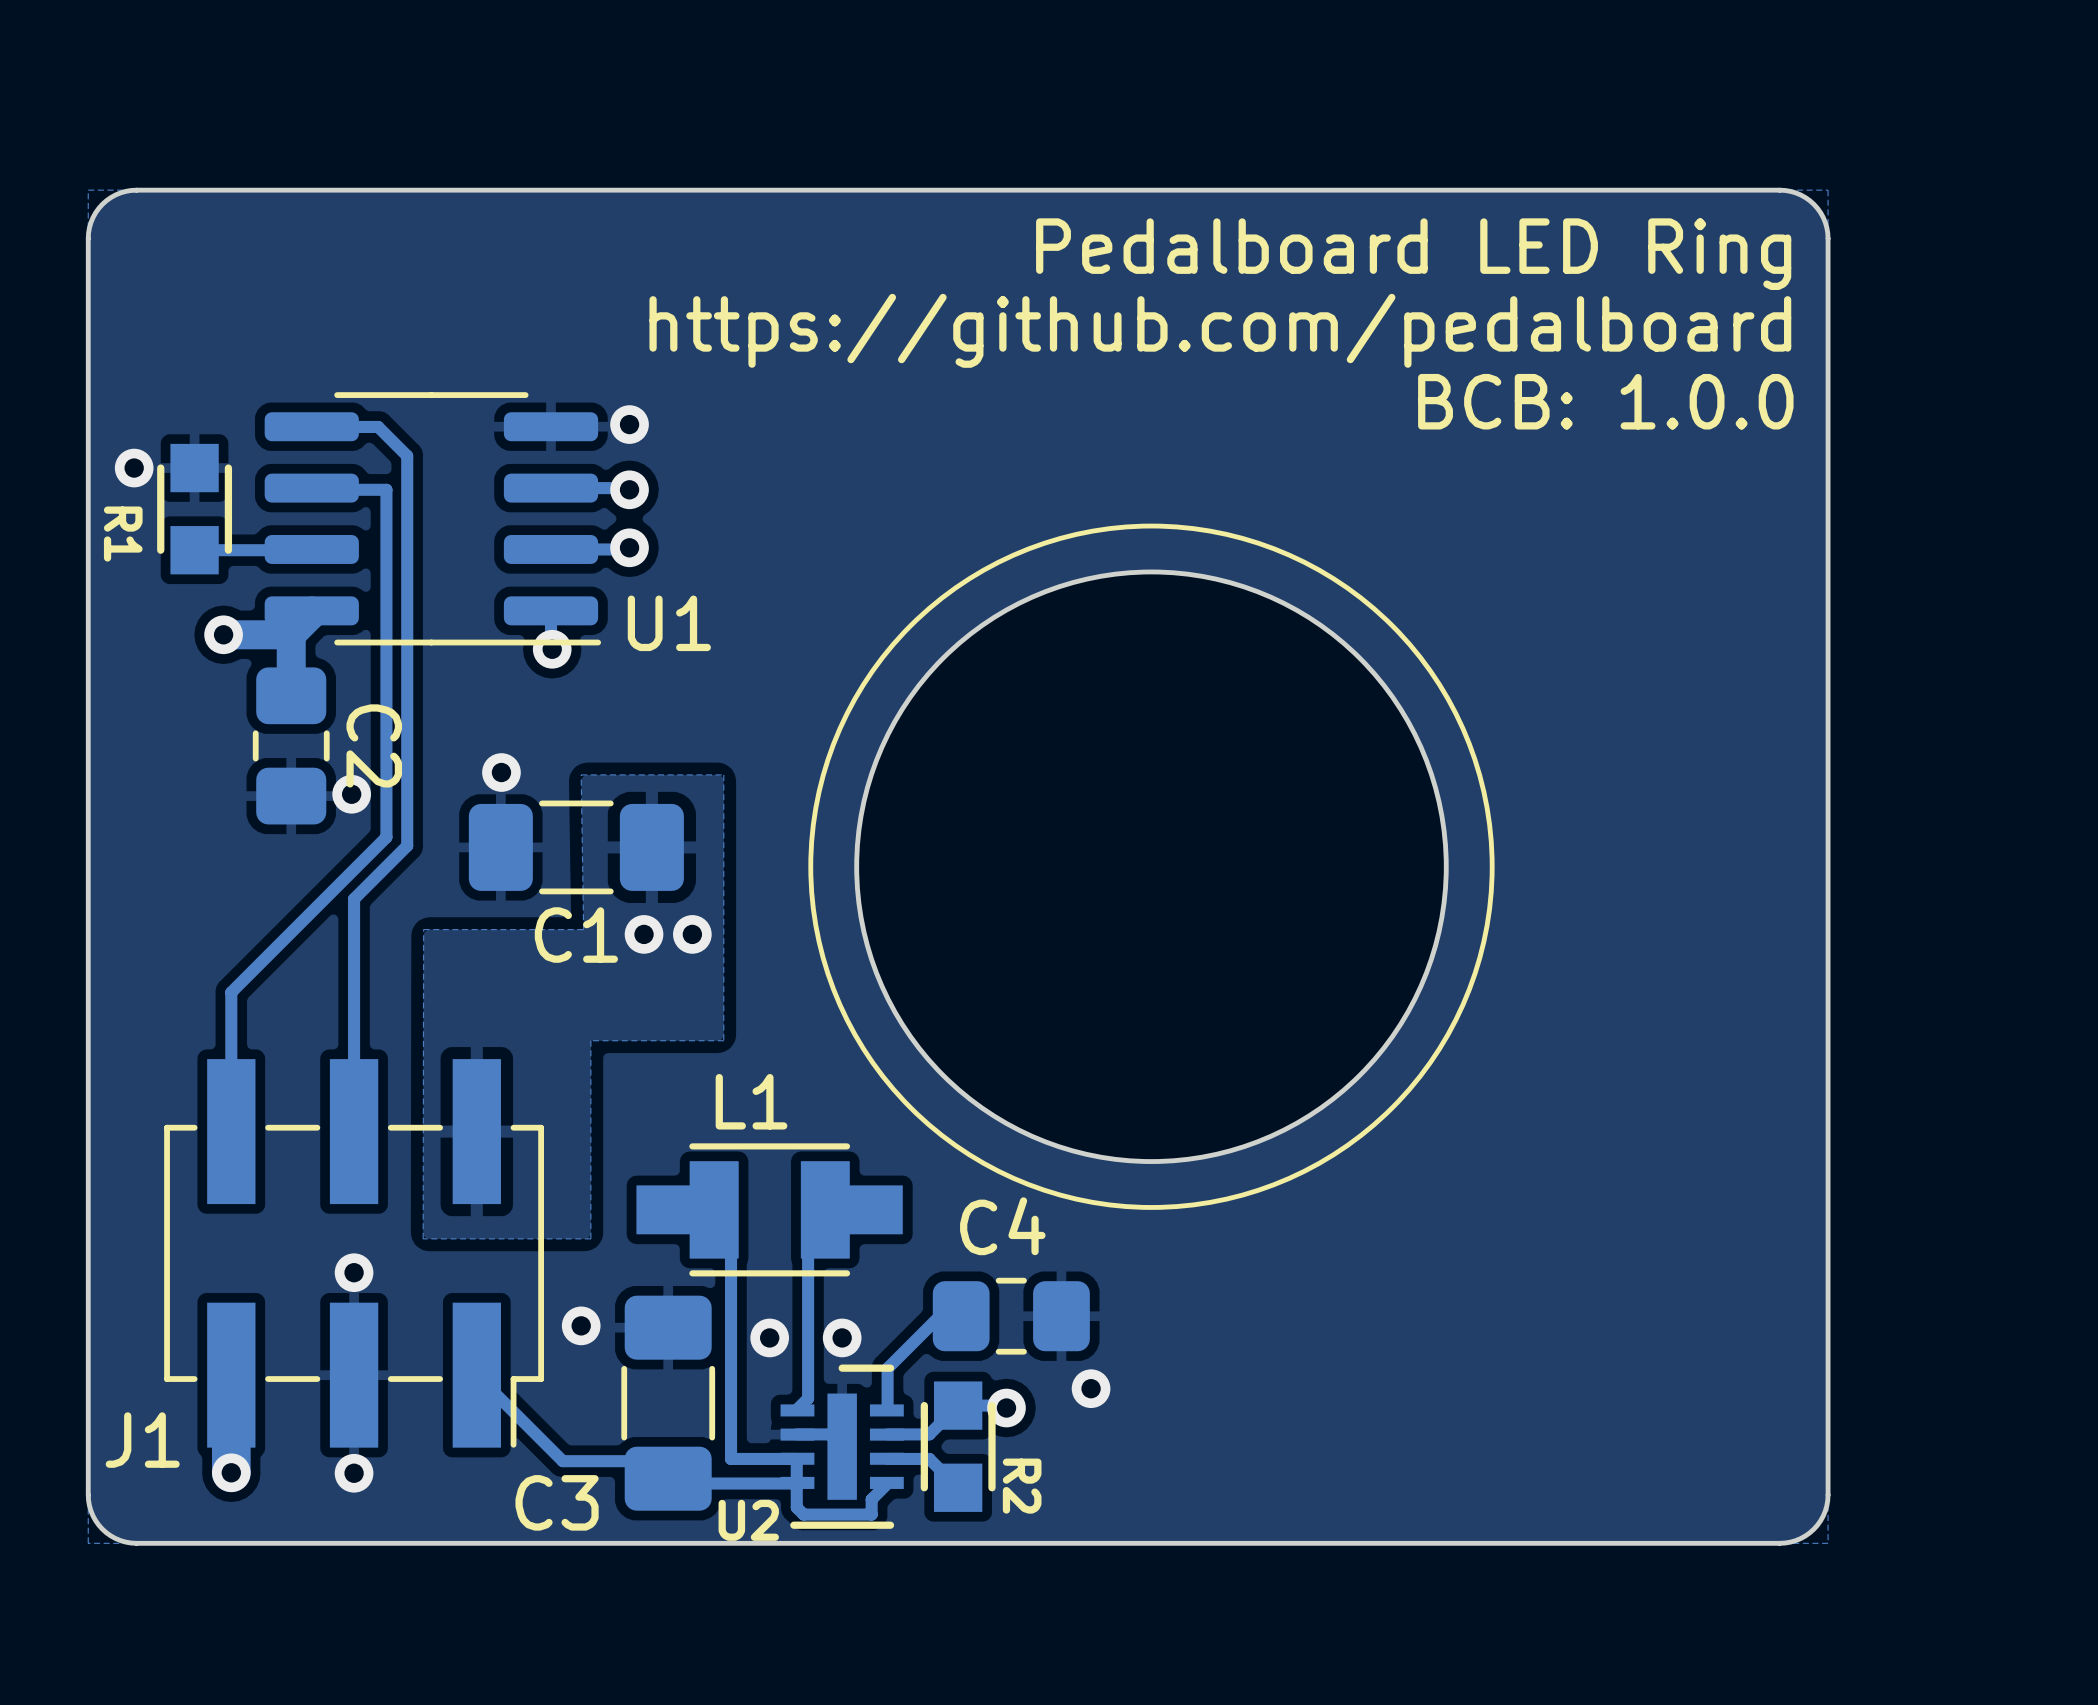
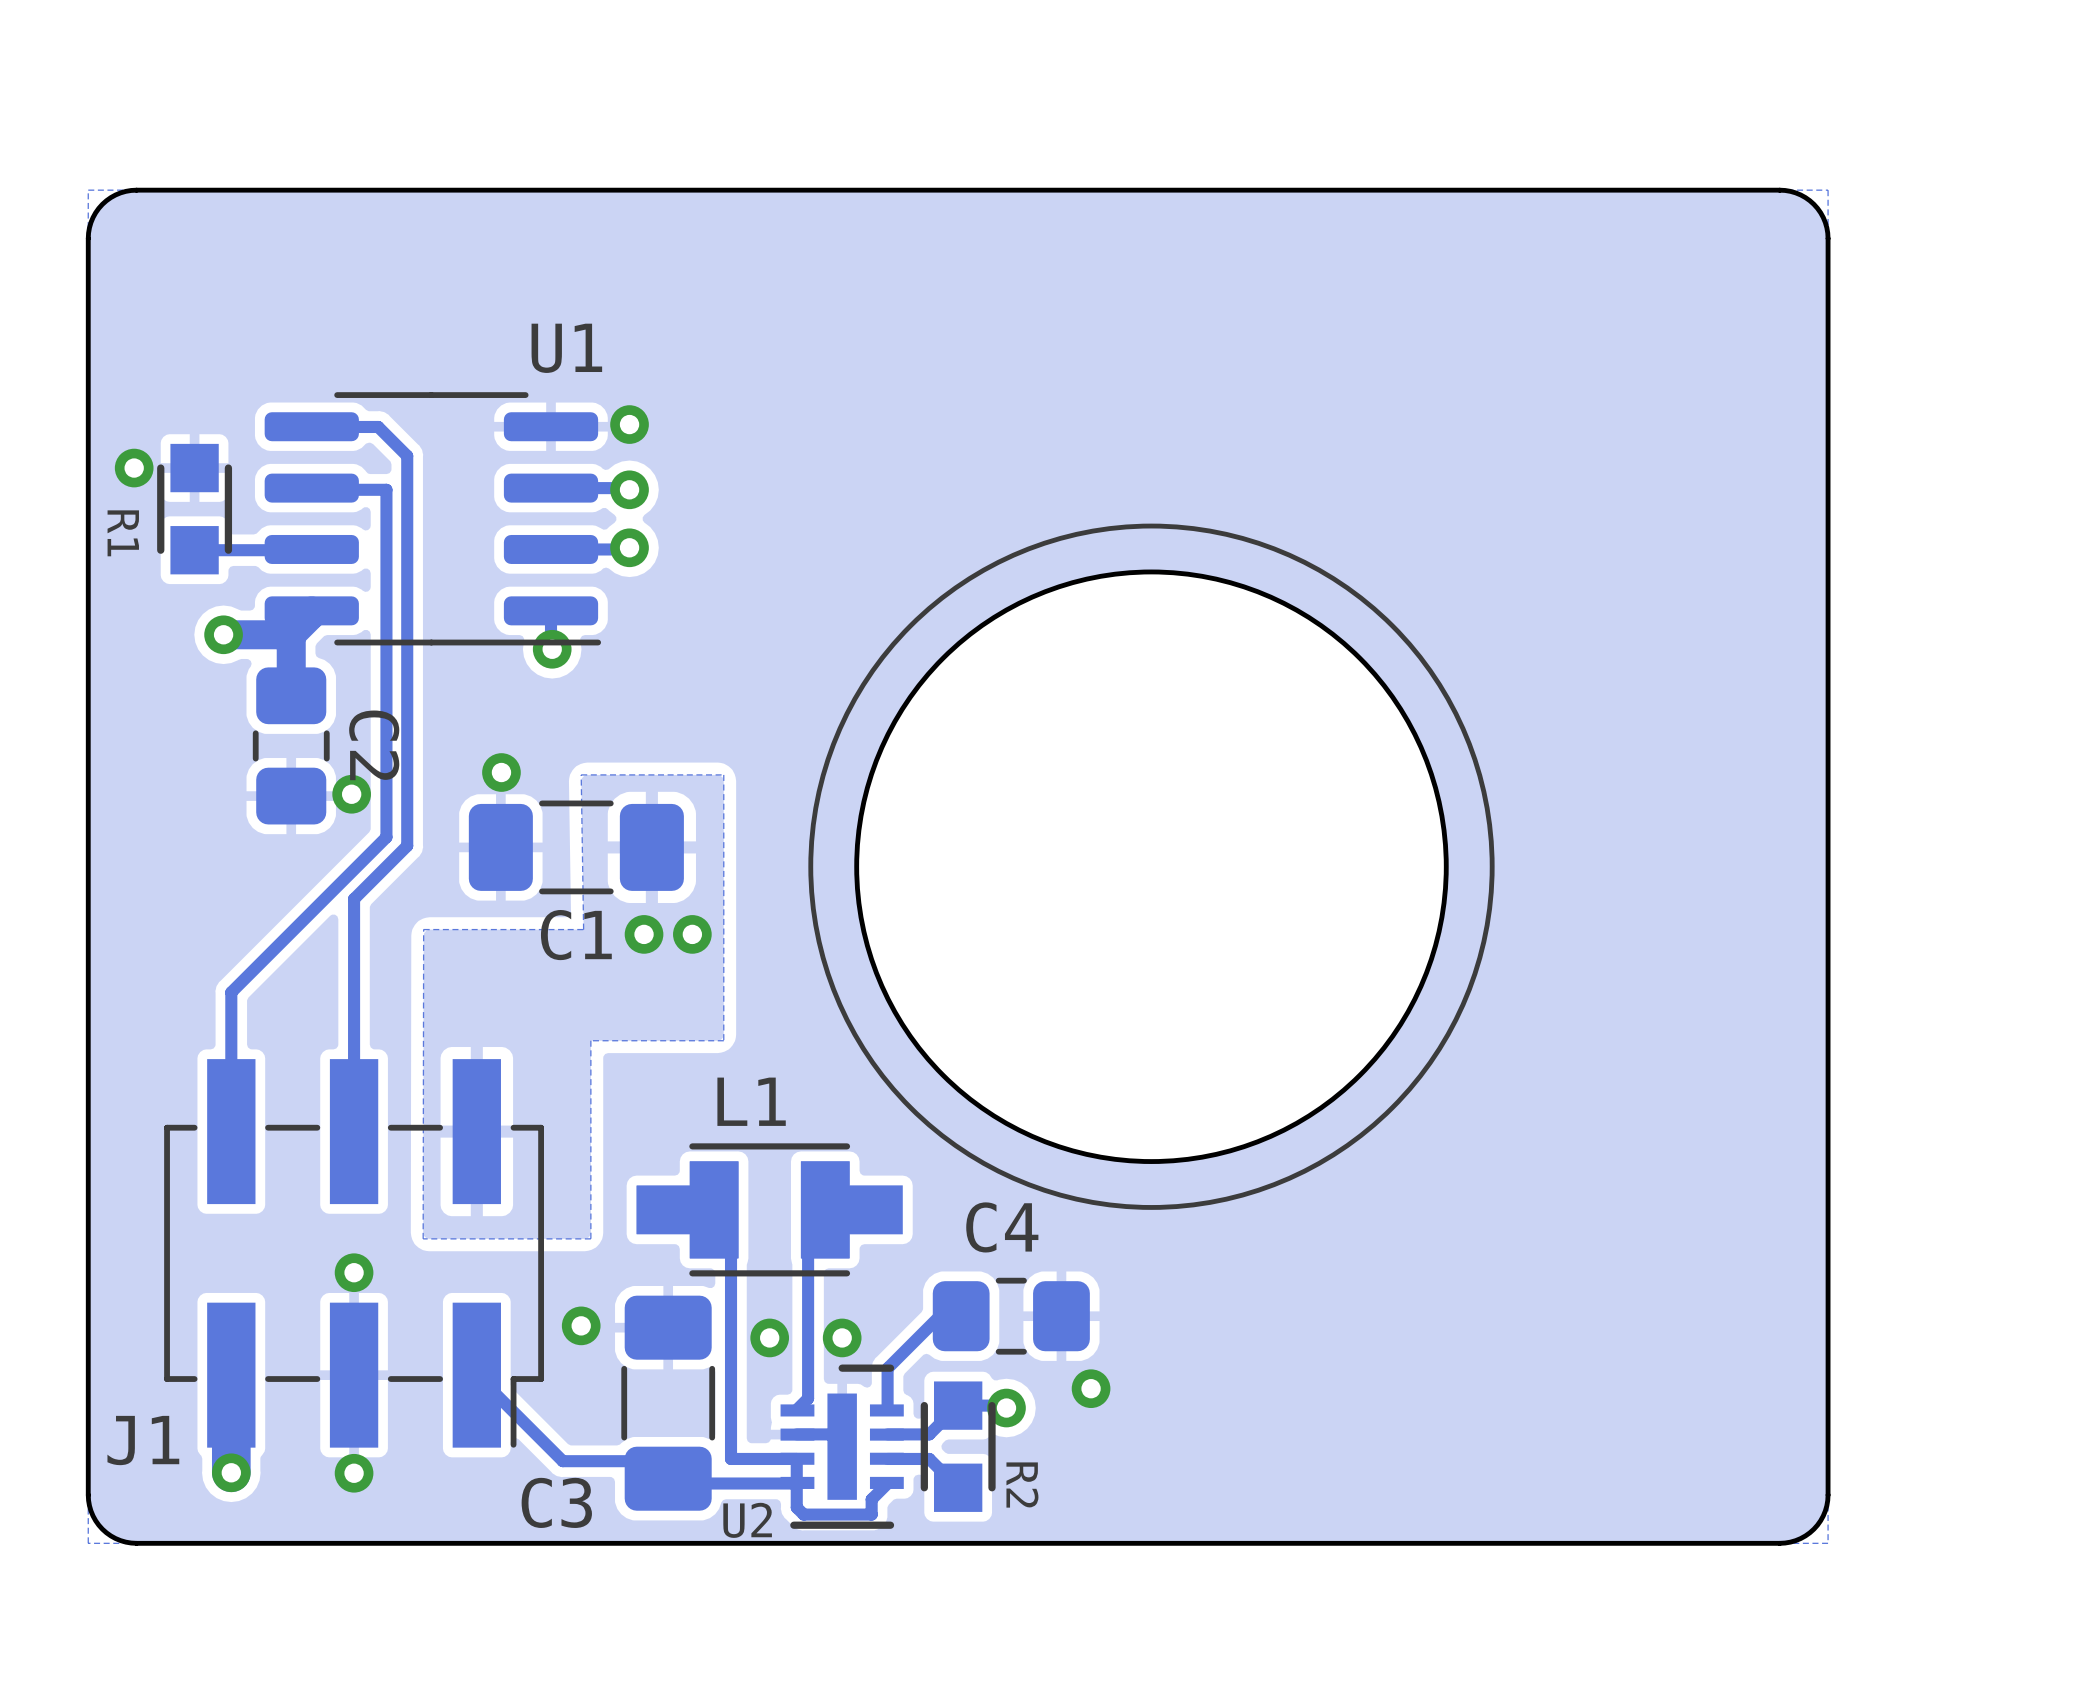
text: Pedalboard LED Ring (1413, 254) -> none
text: https://github.com/pedalboard (1220, 330) -> none
text: BCB: 1.0.0 (1605, 401) -> none
U1 name position: U1 (669, 623) -> U1 (566, 348)

